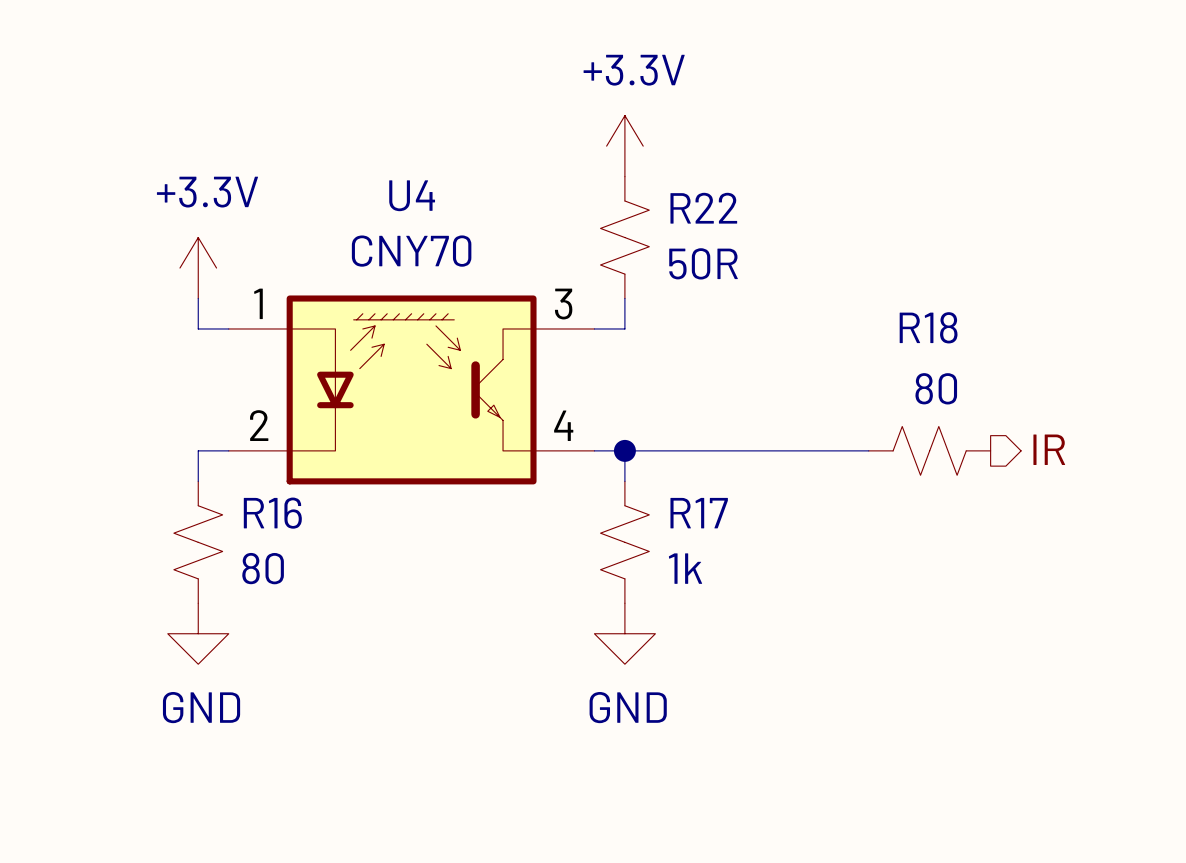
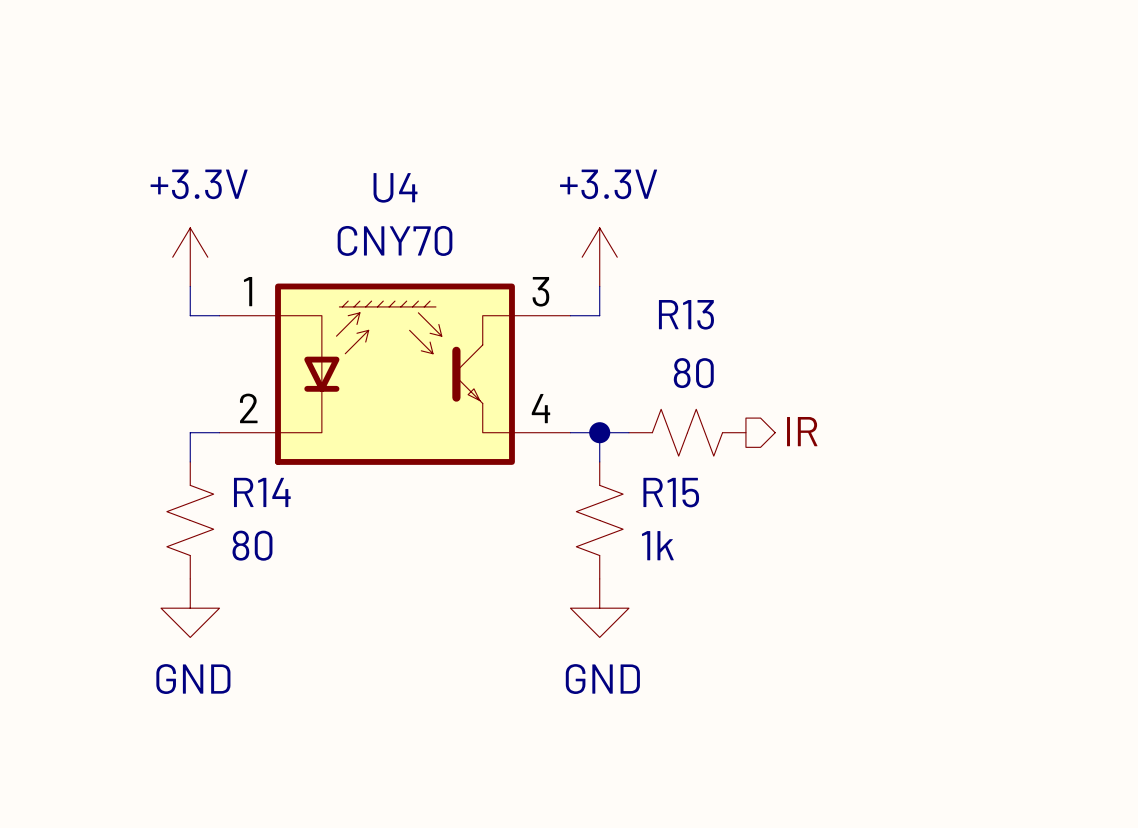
power symbol position: +3.3V (624, 146) -> +3.3V (599, 257)
R22: 50R (624, 237) -> none
hierarchical label position: IR (1049, 449) -> IR (802, 431)
wire: (655, 450) (868, 450) -> none
R13: none -> 80 (687, 432)
R18: 80 (929, 450) -> none
R16 name: R16 (272, 513) -> R14 (262, 492)
R17 name: R17 (699, 513) -> R15 (671, 492)

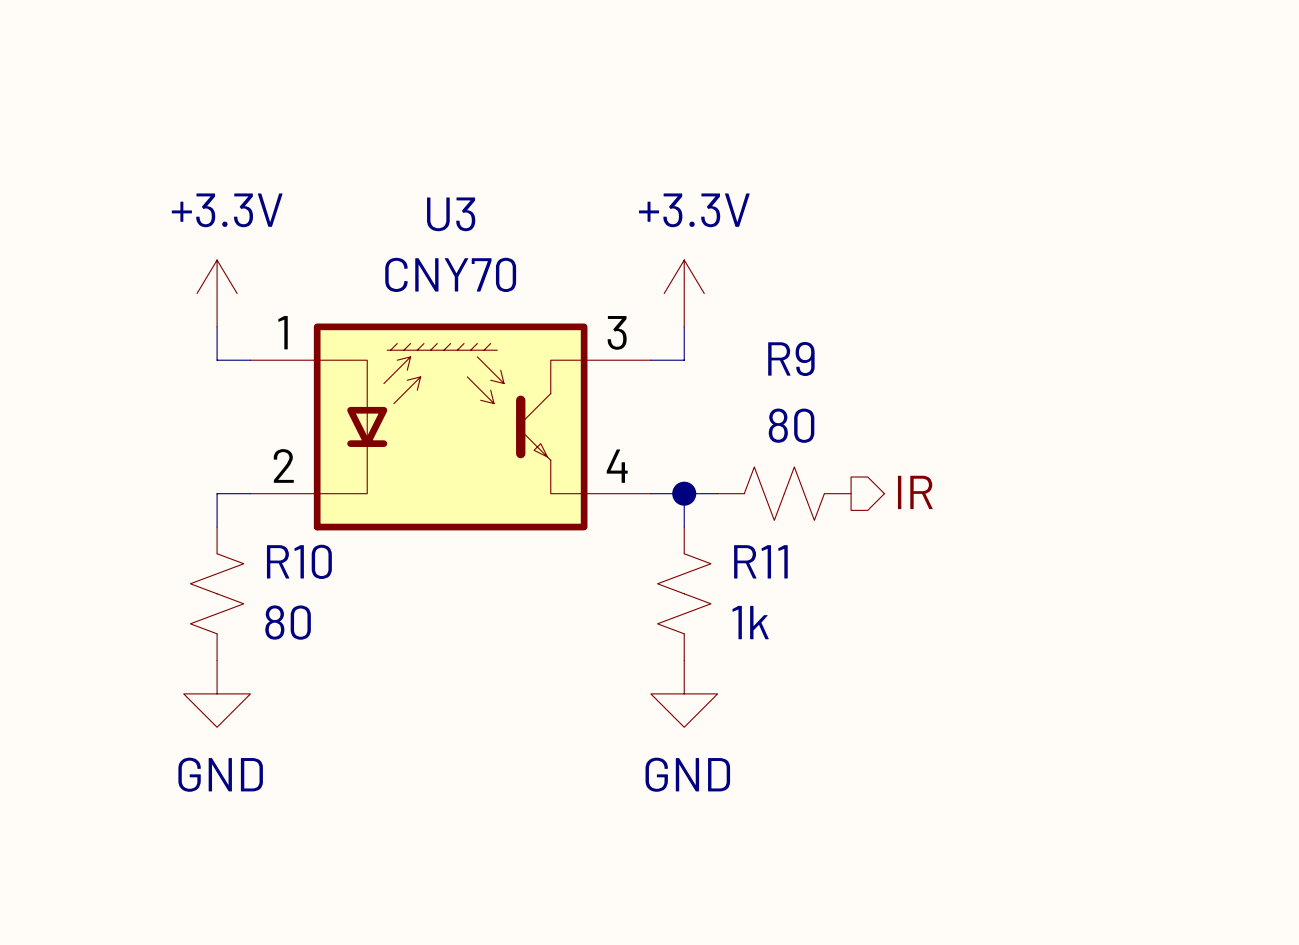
U4 name: U4 (395, 187) -> U3 (451, 214)
R13 name: R13 (686, 314) -> R9 (791, 358)
R14 name: R14 (262, 492) -> R10 (299, 561)
R15 name: R15 (671, 492) -> R11 (760, 561)

